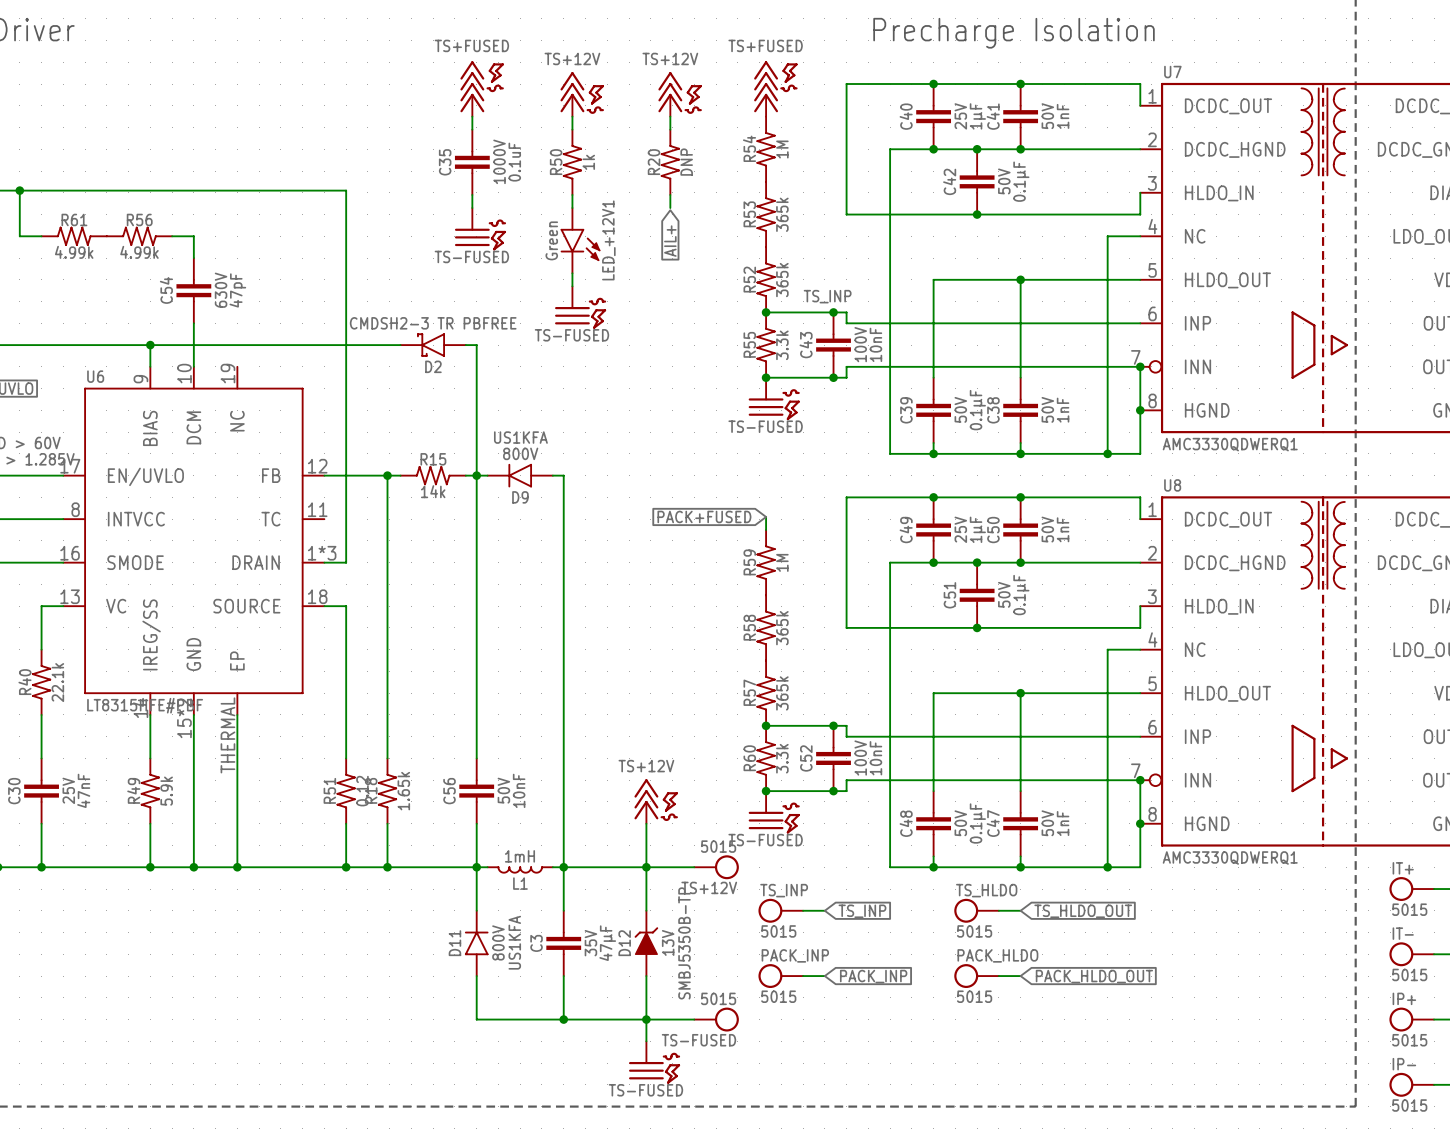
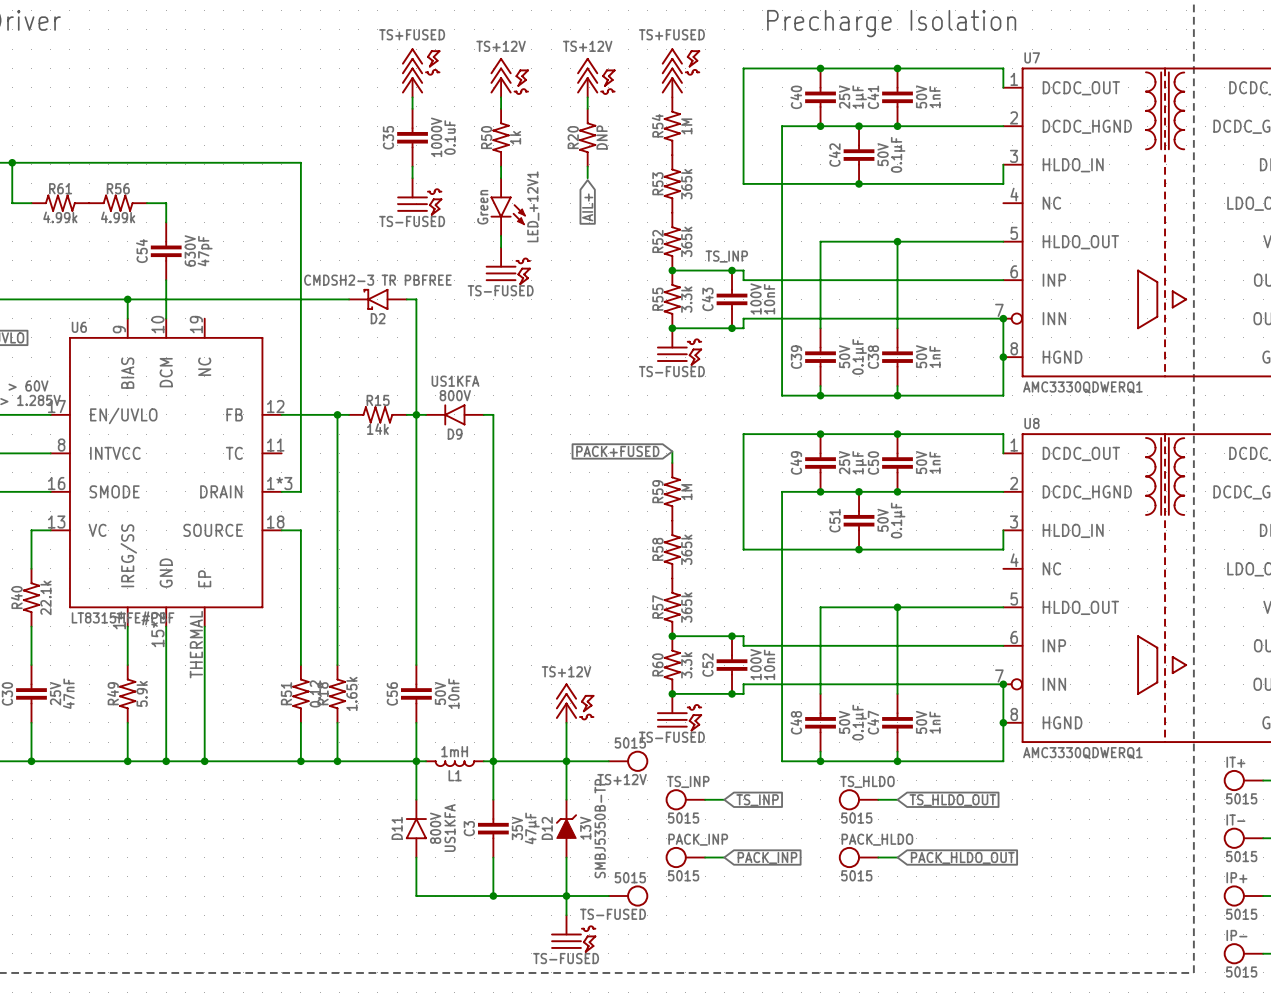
wire: (1140, 236) (1107, 236) (1107, 453) -> none
junction: (1107, 453) -> none
wire: (1140, 649) (1107, 649) (1107, 867) -> none
junction: (1107, 867) -> none

